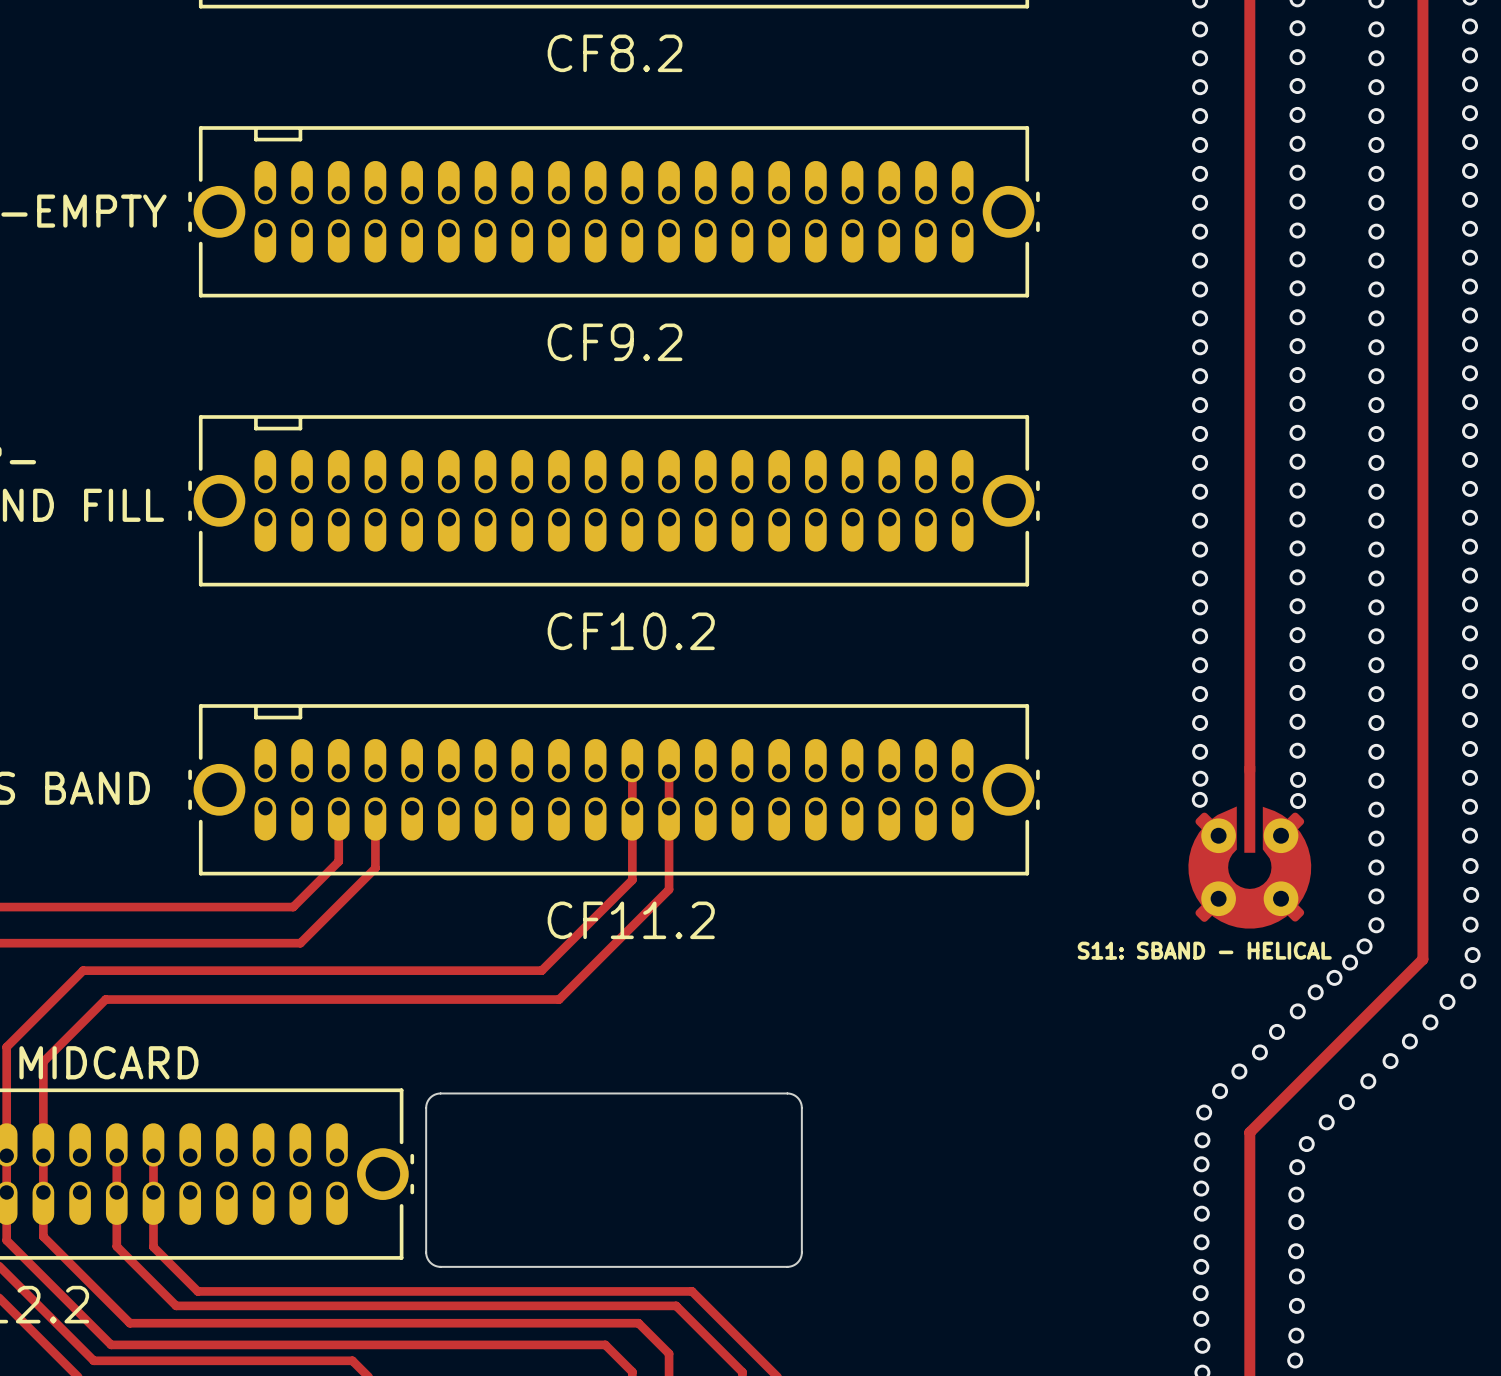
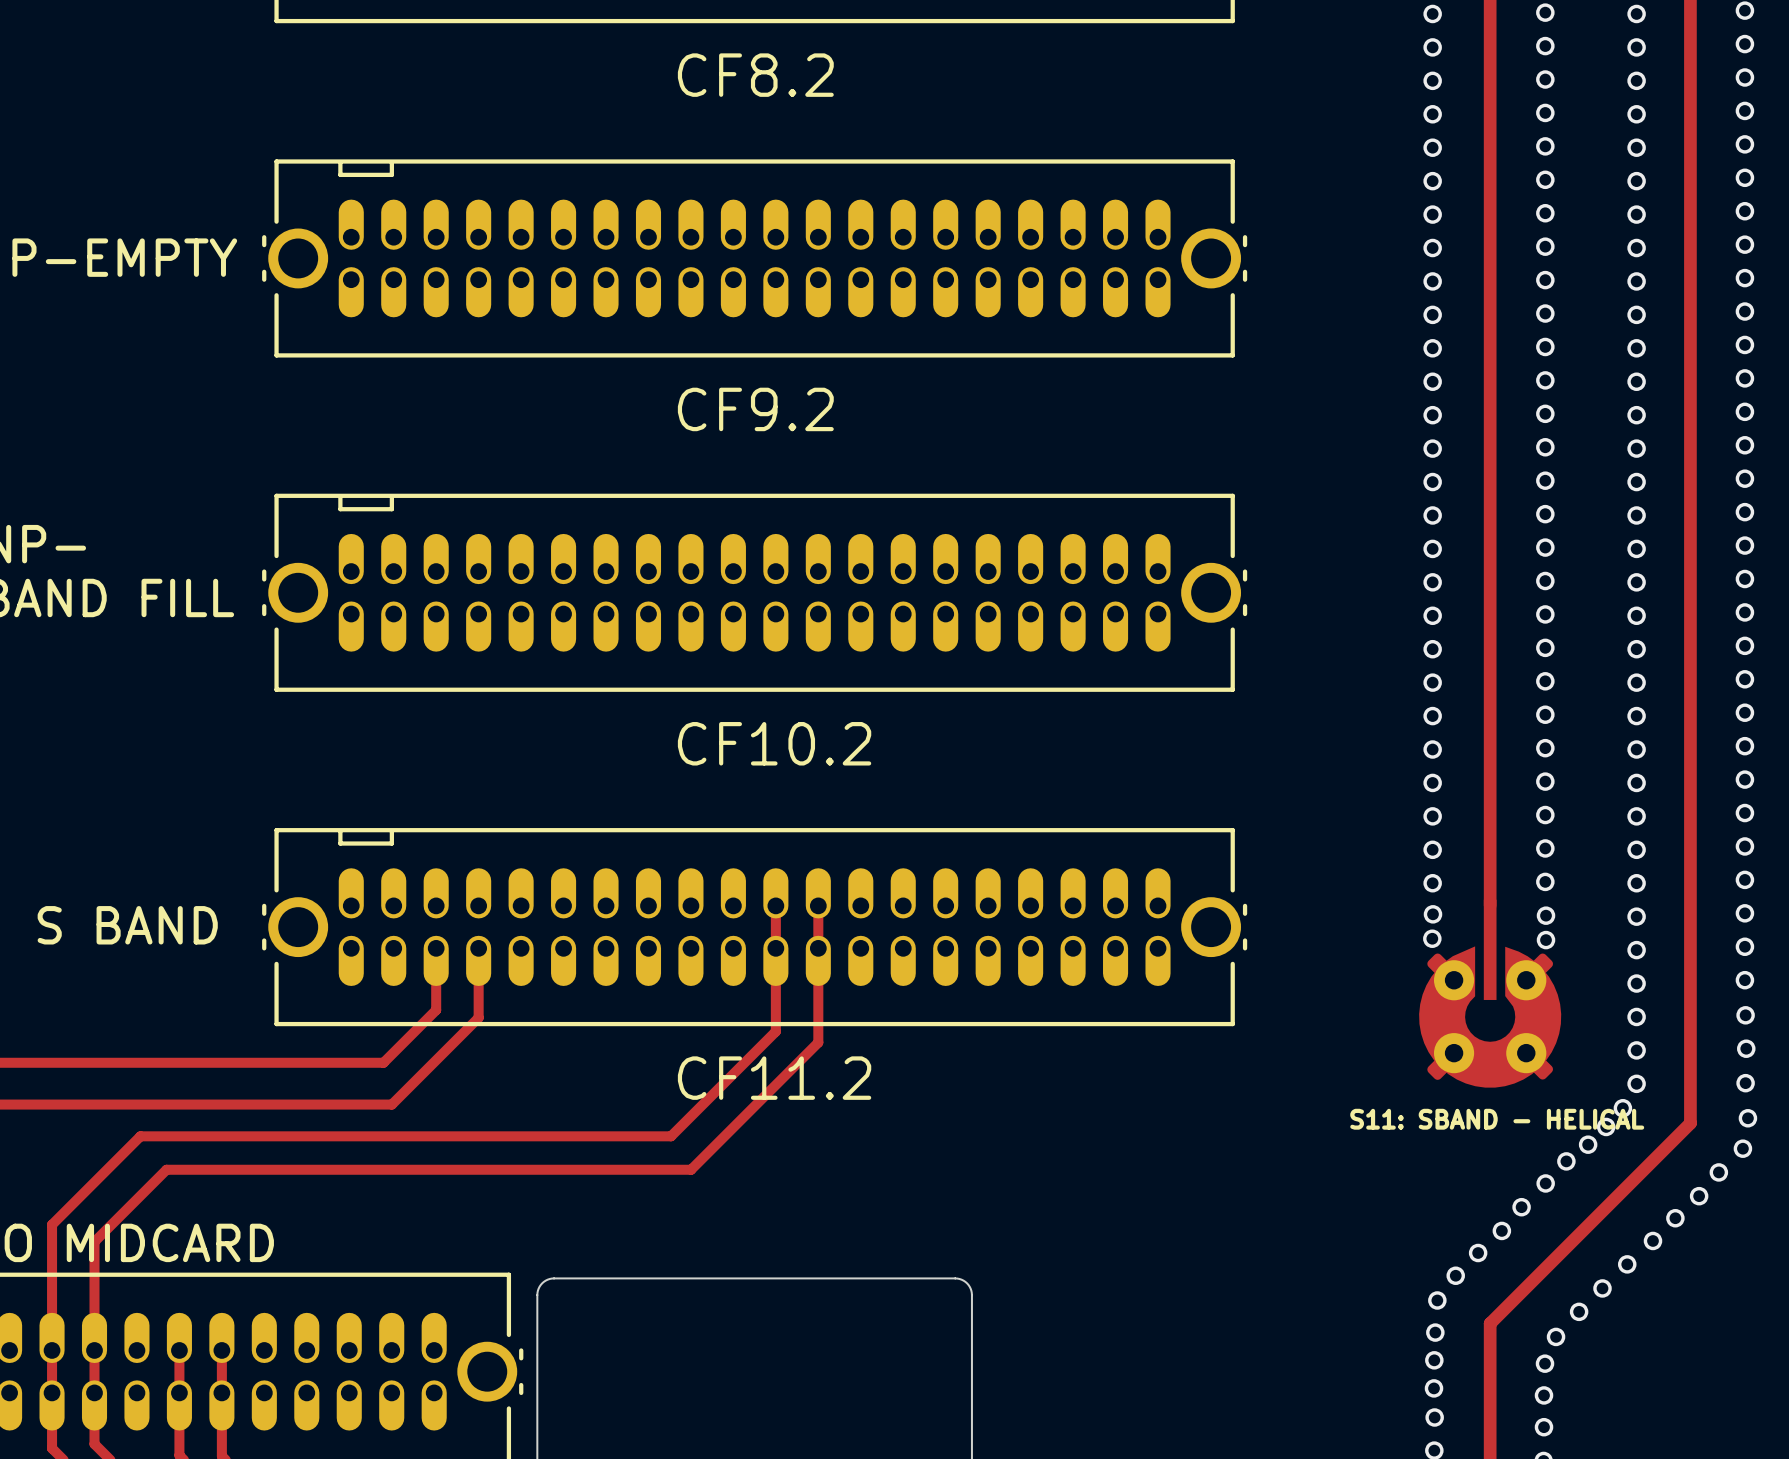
text position: S11: SBAND - HELICAL (1204, 950) -> S11: SBAND - HELICAL (1497, 1119)

